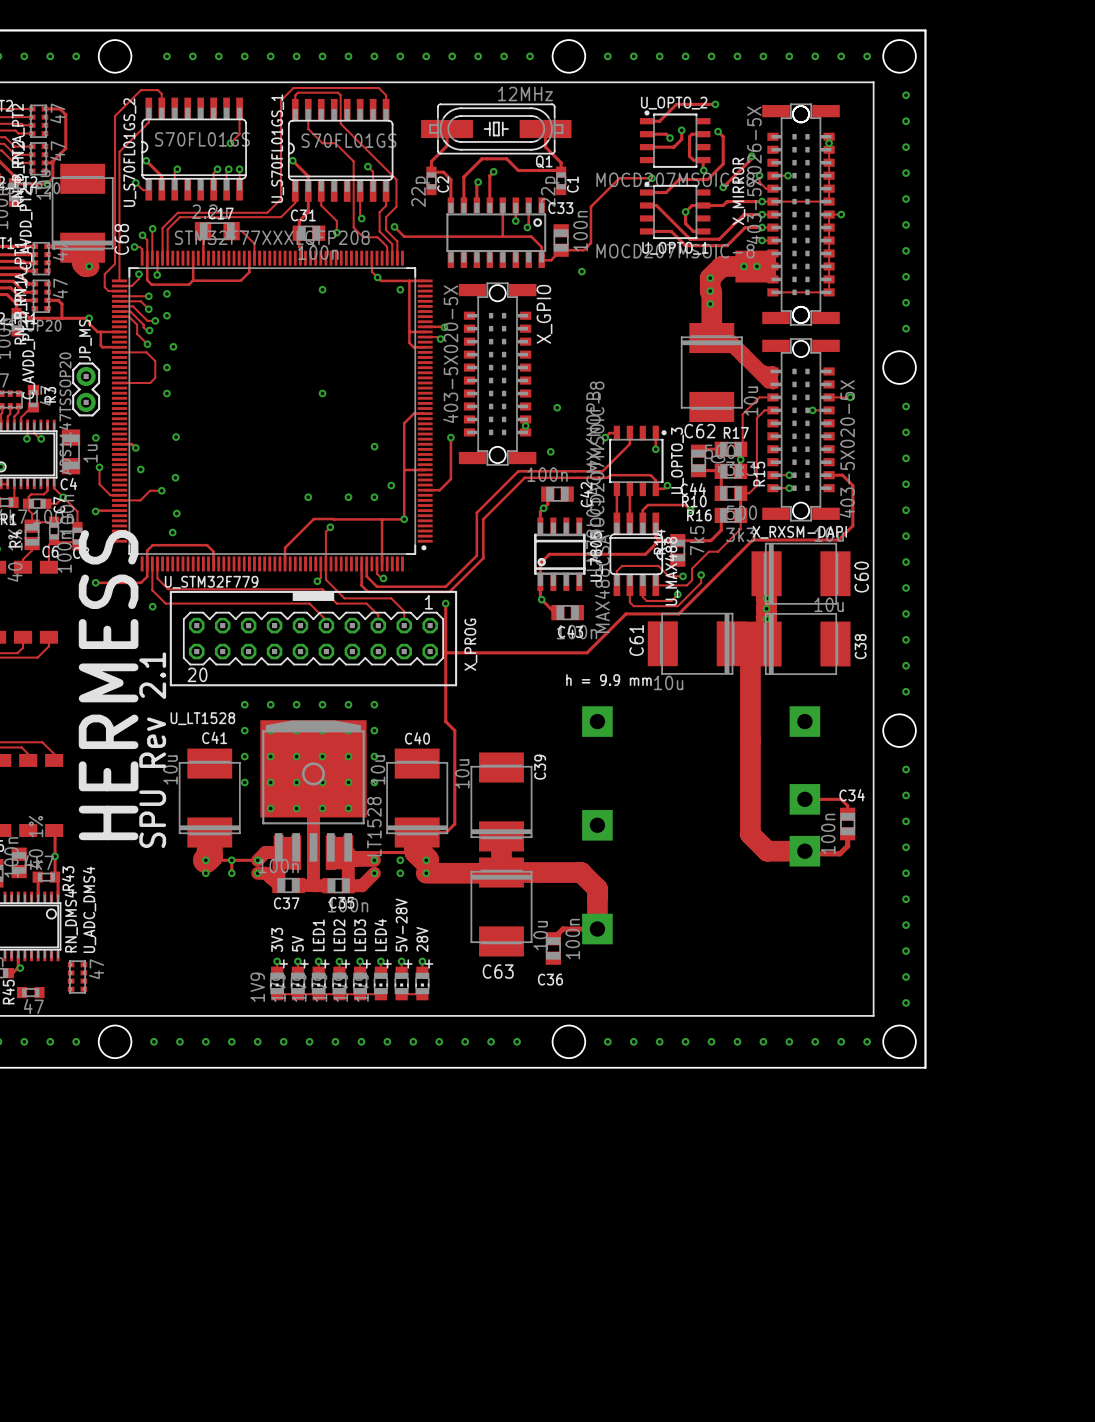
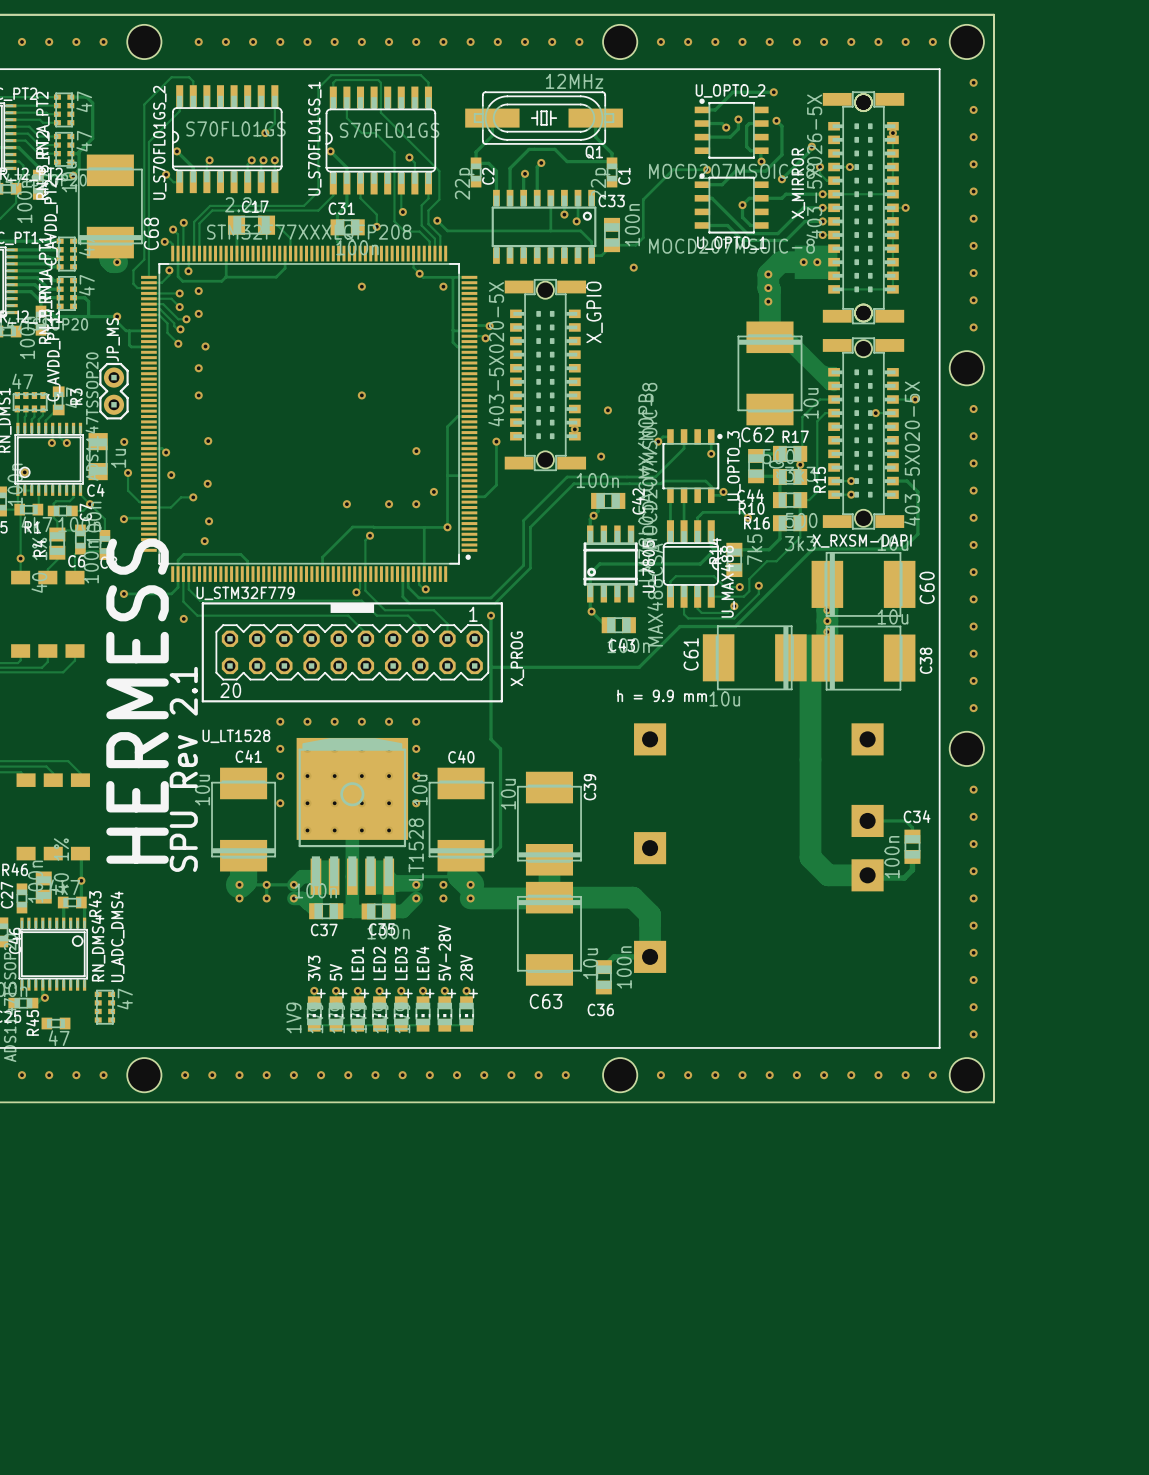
track: (119, 352) (146, 352) (155, 361) (155, 377) (150, 382) (119, 382) -> none

